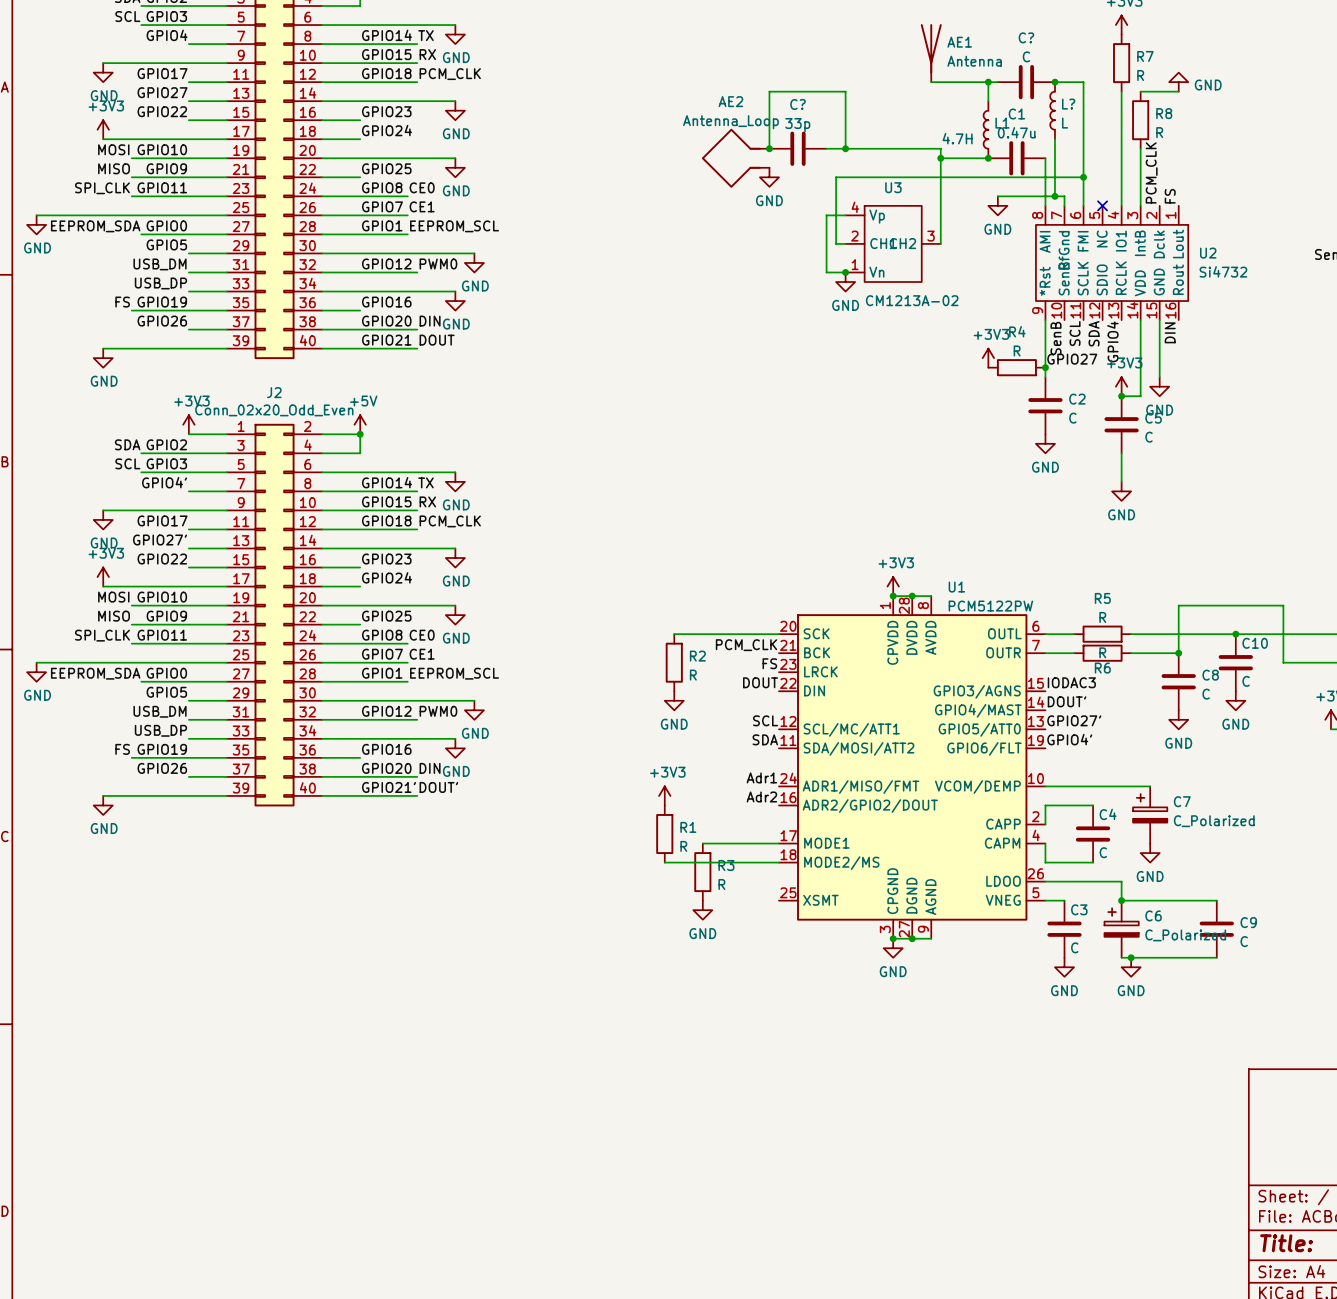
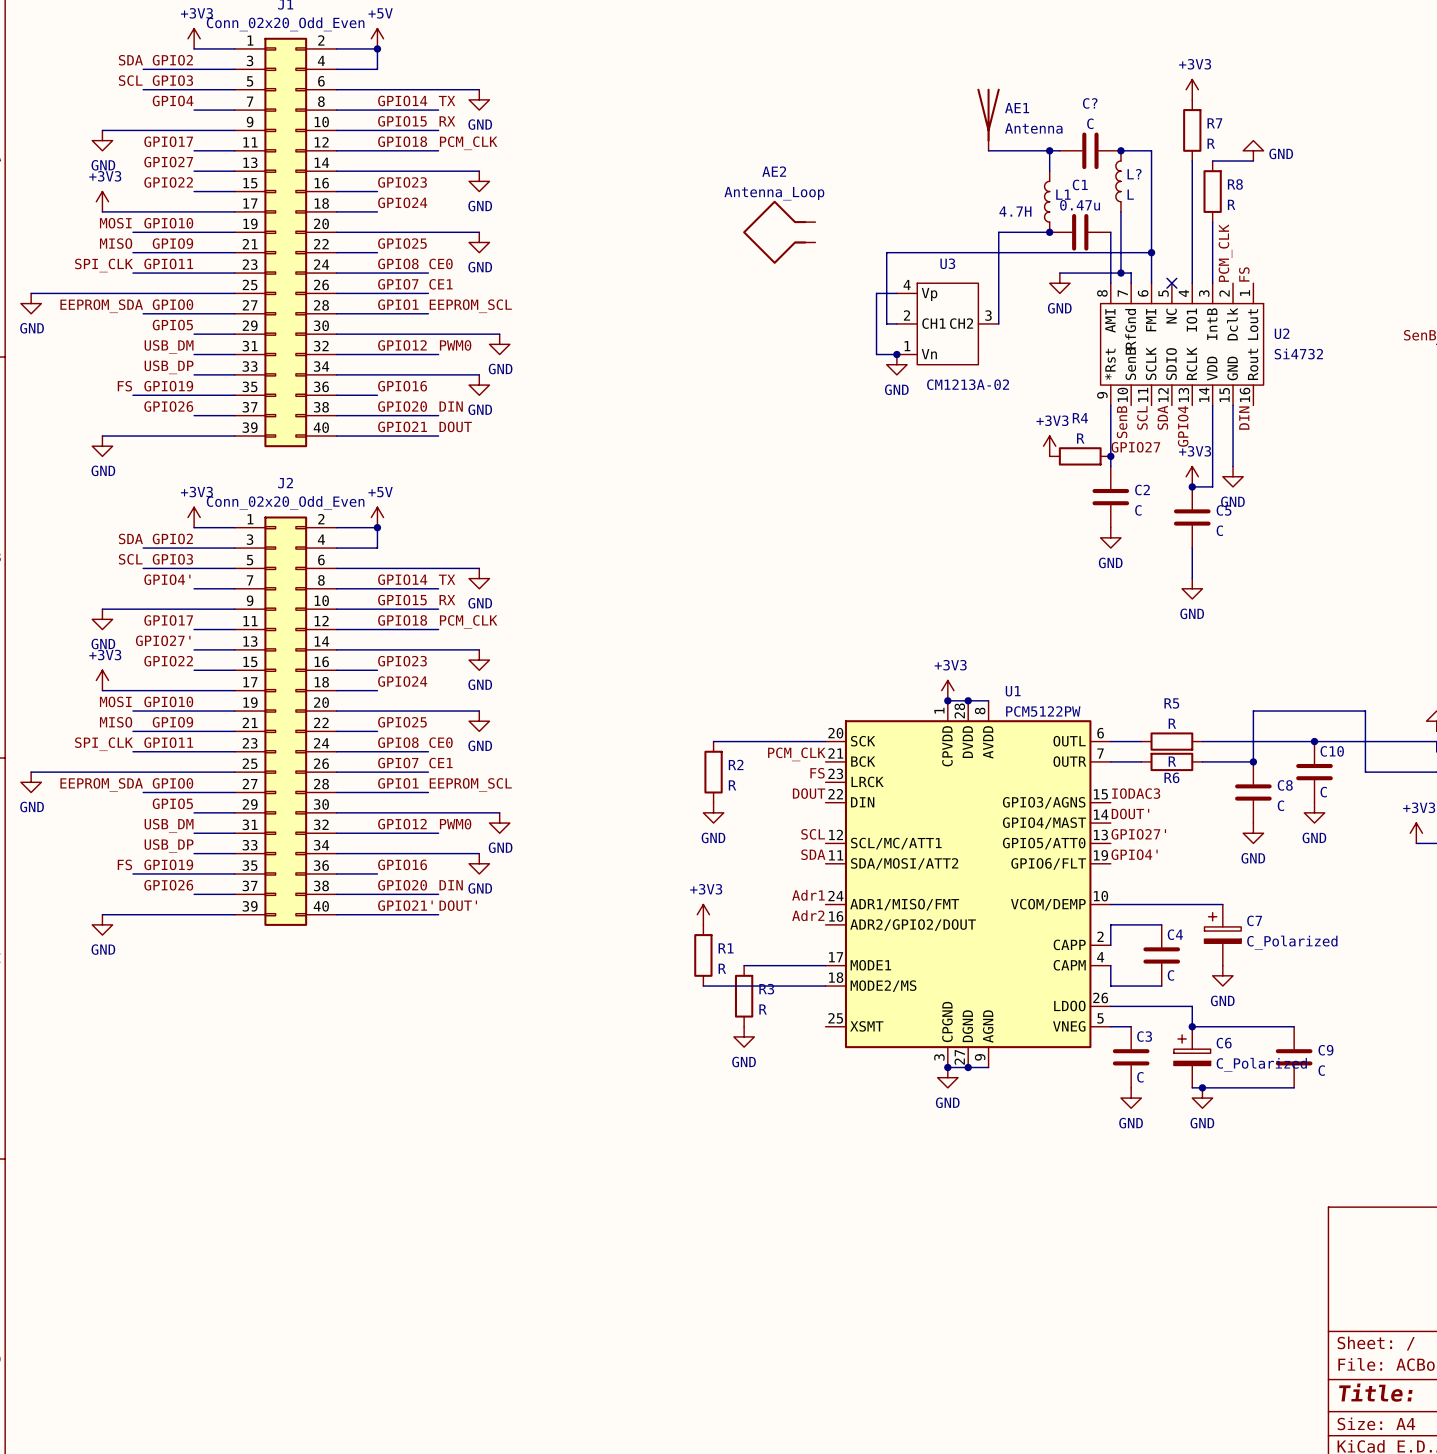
wire: (769, 148) (769, 91) (845, 91) (845, 148) -> none
junction: (769, 148) -> none
C?: 33p (798, 148) -> none
wire: (826, 148) (940, 148) (940, 158) -> none
junction: (845, 148) -> none
junction: (940, 158) -> none
power symbol: GND (769, 177) -> none

